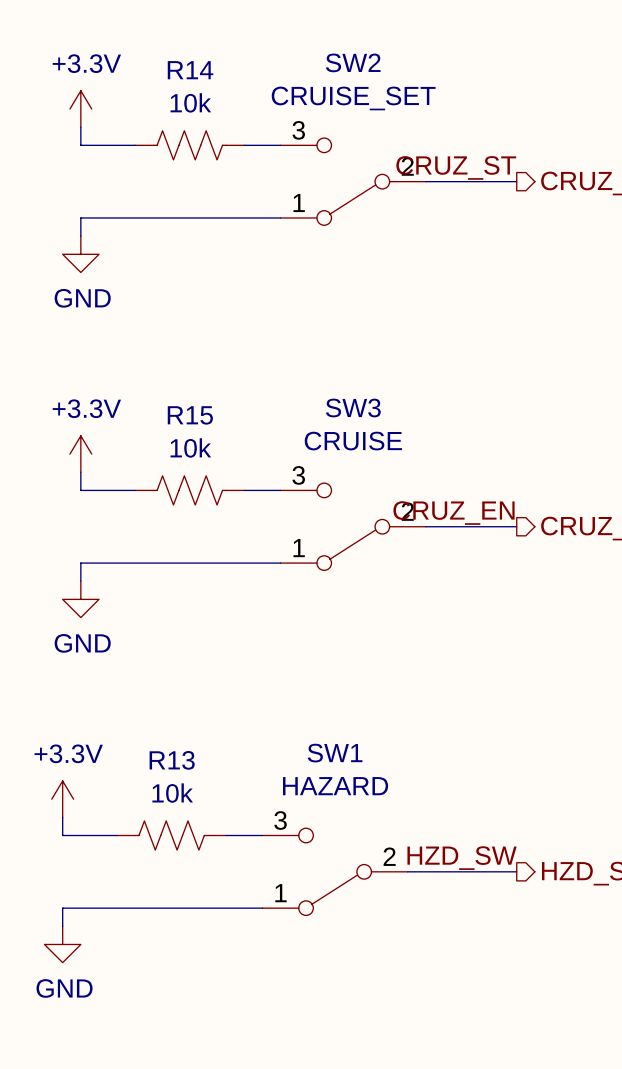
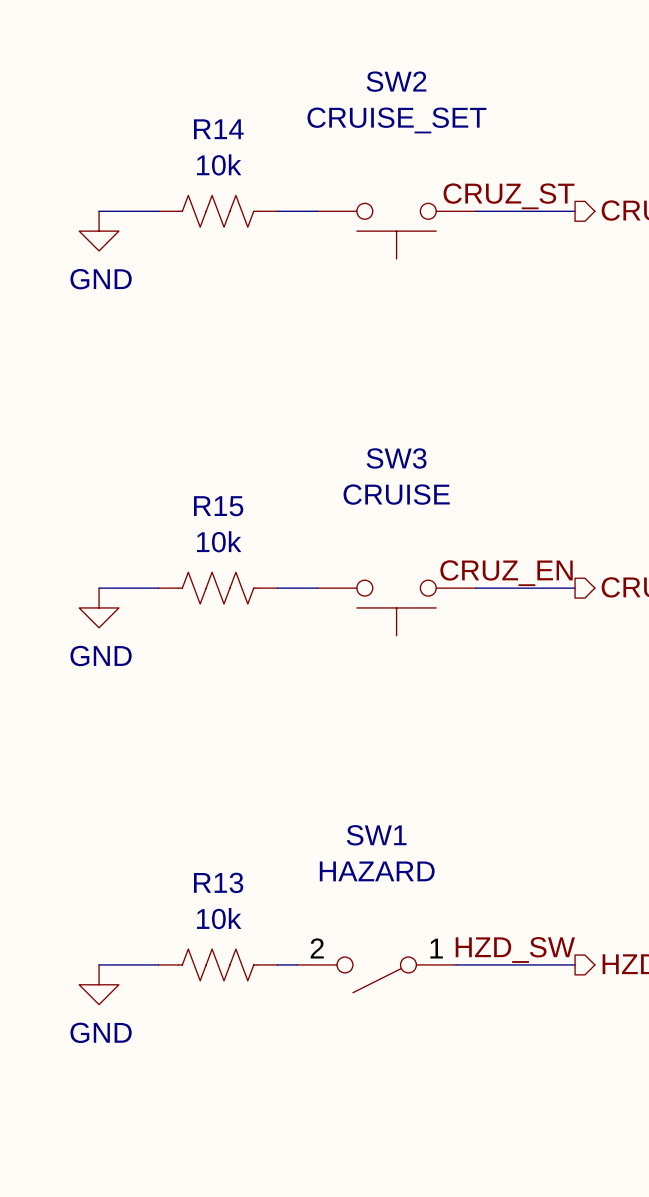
power symbol: +3.3V (80, 109) -> none
wire: (80, 127) (80, 145) (135, 145) -> none
SW2 symbol: [280, 138, 426, 226] -> [317, 203, 476, 259]
R14 position: (189, 145) -> (218, 211)
wire: (244, 145) (280, 145) -> (277, 211) (317, 211)
wire: none -> (99, 211) (158, 211)
wire: (280, 217) (80, 217) (80, 236) -> none
power symbol position: GND (80, 254) -> GND (99, 231)
power symbol: +3.3V (80, 454) -> none
wire: (80, 472) (80, 490) (135, 490) -> none
SW3 symbol: [280, 483, 426, 571] -> [317, 580, 476, 636]
R15 position: (189, 490) -> (218, 588)
wire: (244, 490) (280, 490) -> (277, 588) (317, 588)
wire: none -> (99, 588) (158, 588)
wire: (280, 563) (80, 563) (80, 581) -> none
power symbol position: GND (80, 599) -> GND (99, 607)
power symbol: +3.3V (62, 799) -> none
wire: (62, 817) (62, 835) (117, 835) -> none
SW1 symbol: [262, 828, 408, 916] -> [297, 957, 457, 993]
R13 position: (171, 835) -> (218, 964)
wire: (226, 835) (262, 835) -> none
wire: none -> (99, 964) (158, 964)
wire: none -> (277, 964) (297, 964)
wire: (262, 908) (62, 908) (62, 926) -> none
power symbol position: GND (62, 944) -> GND (99, 984)

